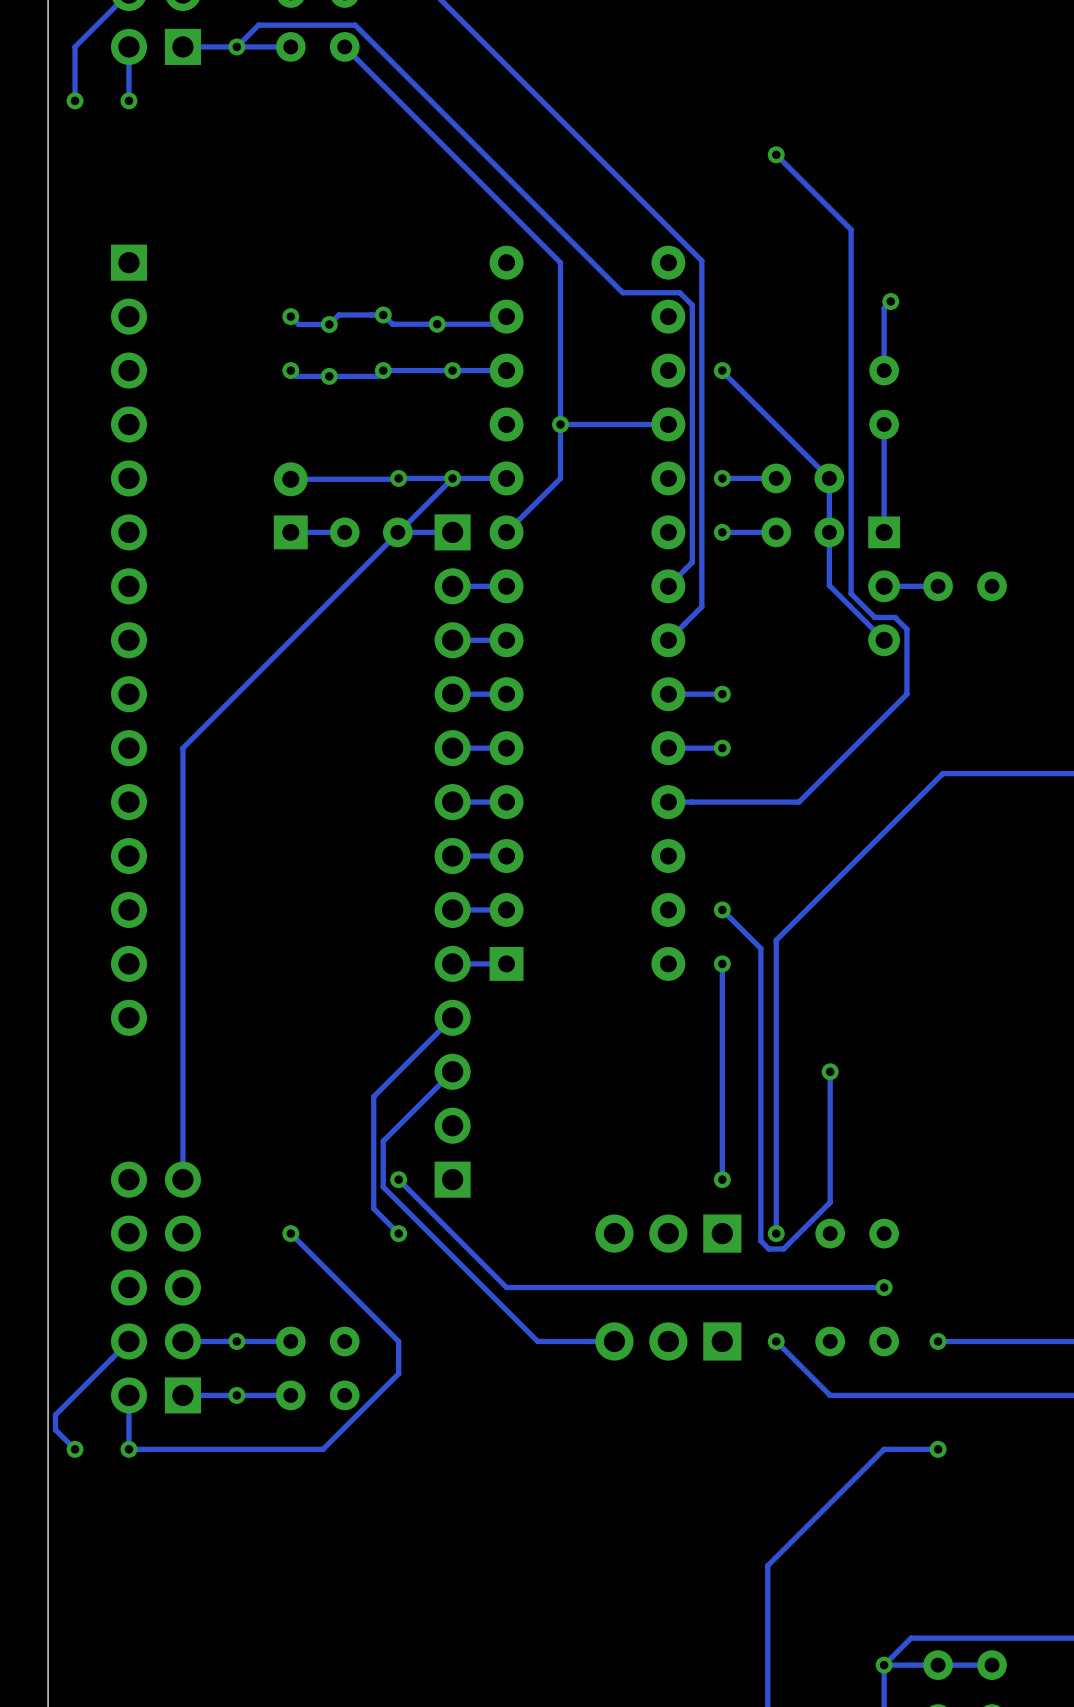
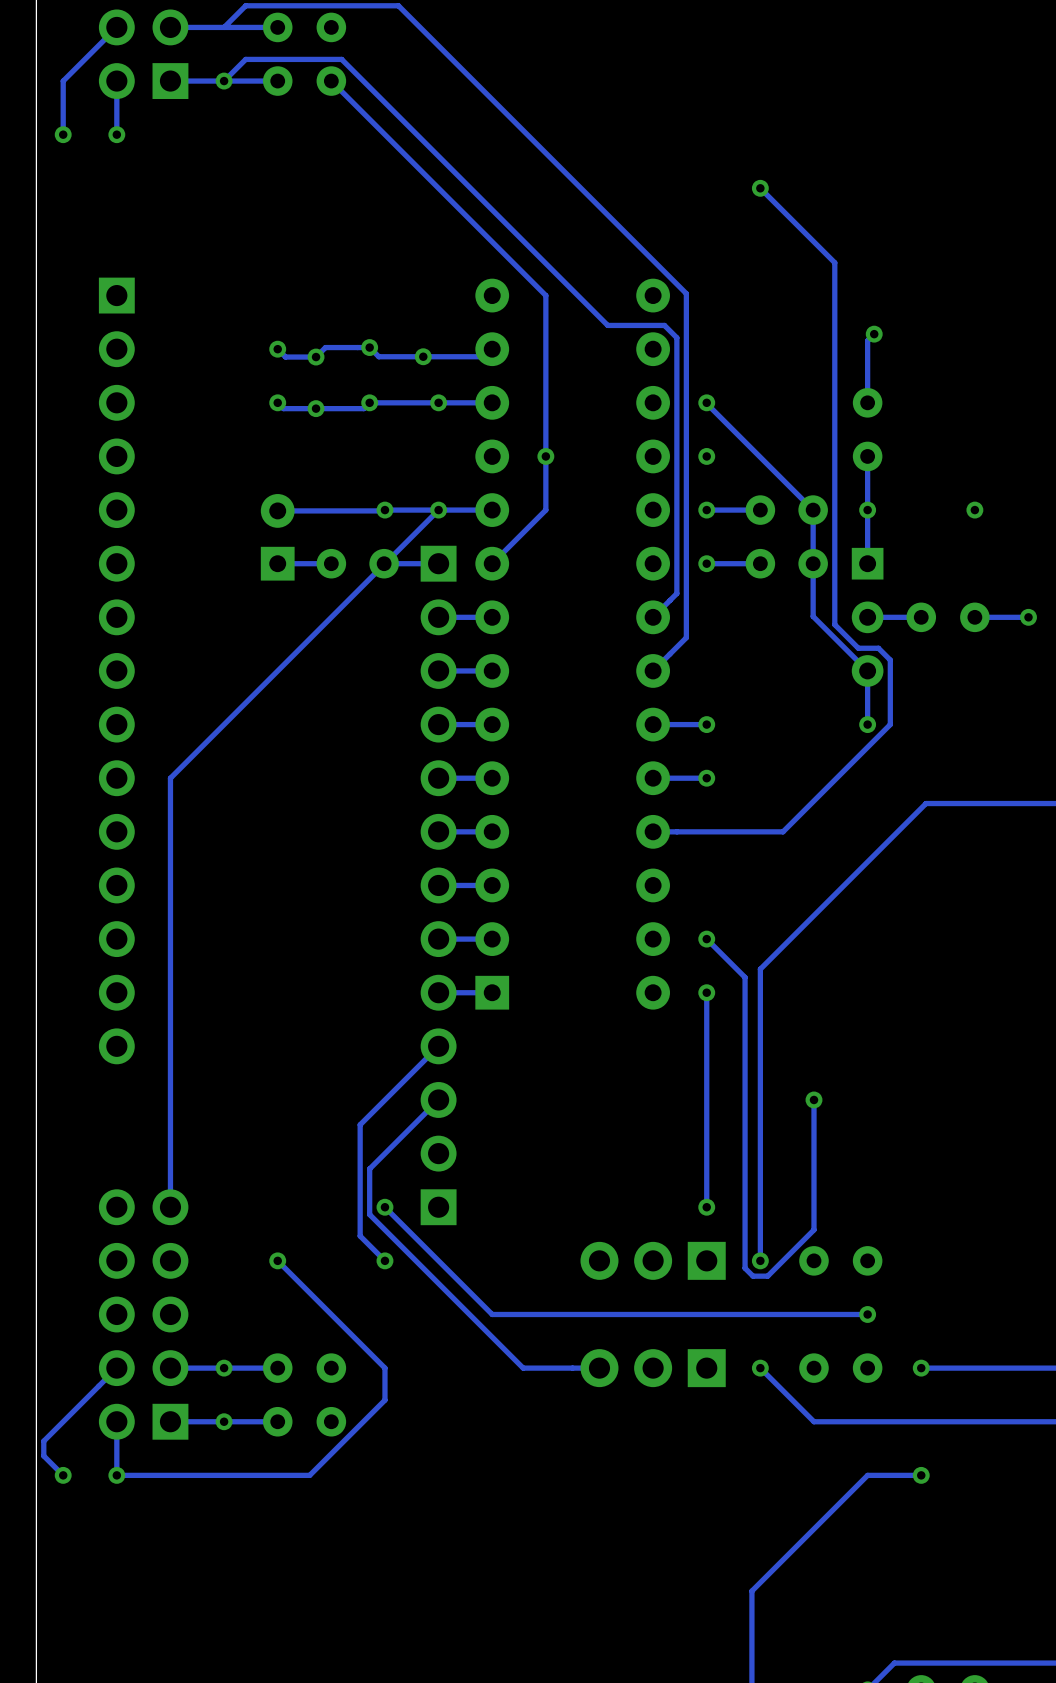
track: (668, 424) (560, 424) -> none
via: none -> (706, 456)
via: none -> (867, 510)
via: none -> (974, 510)
track: none -> (1028, 617) (974, 617)
via: none -> (1028, 617)
track: none -> (867, 670) (867, 724)
via: none -> (867, 724)

